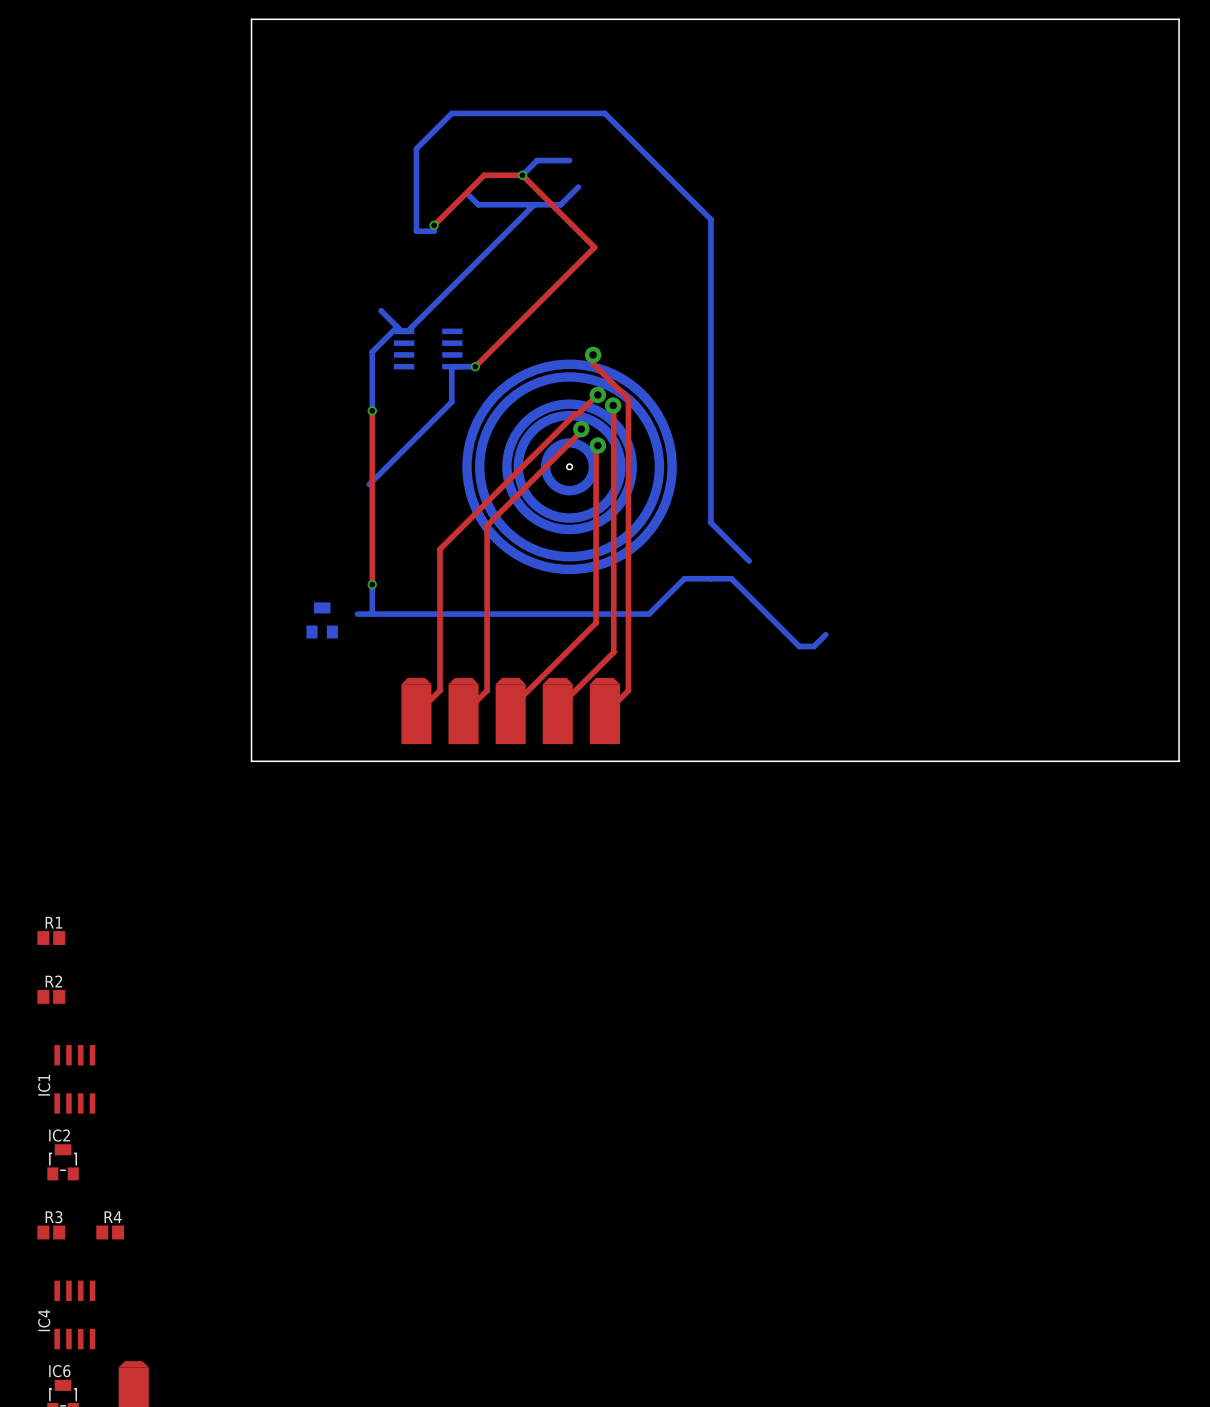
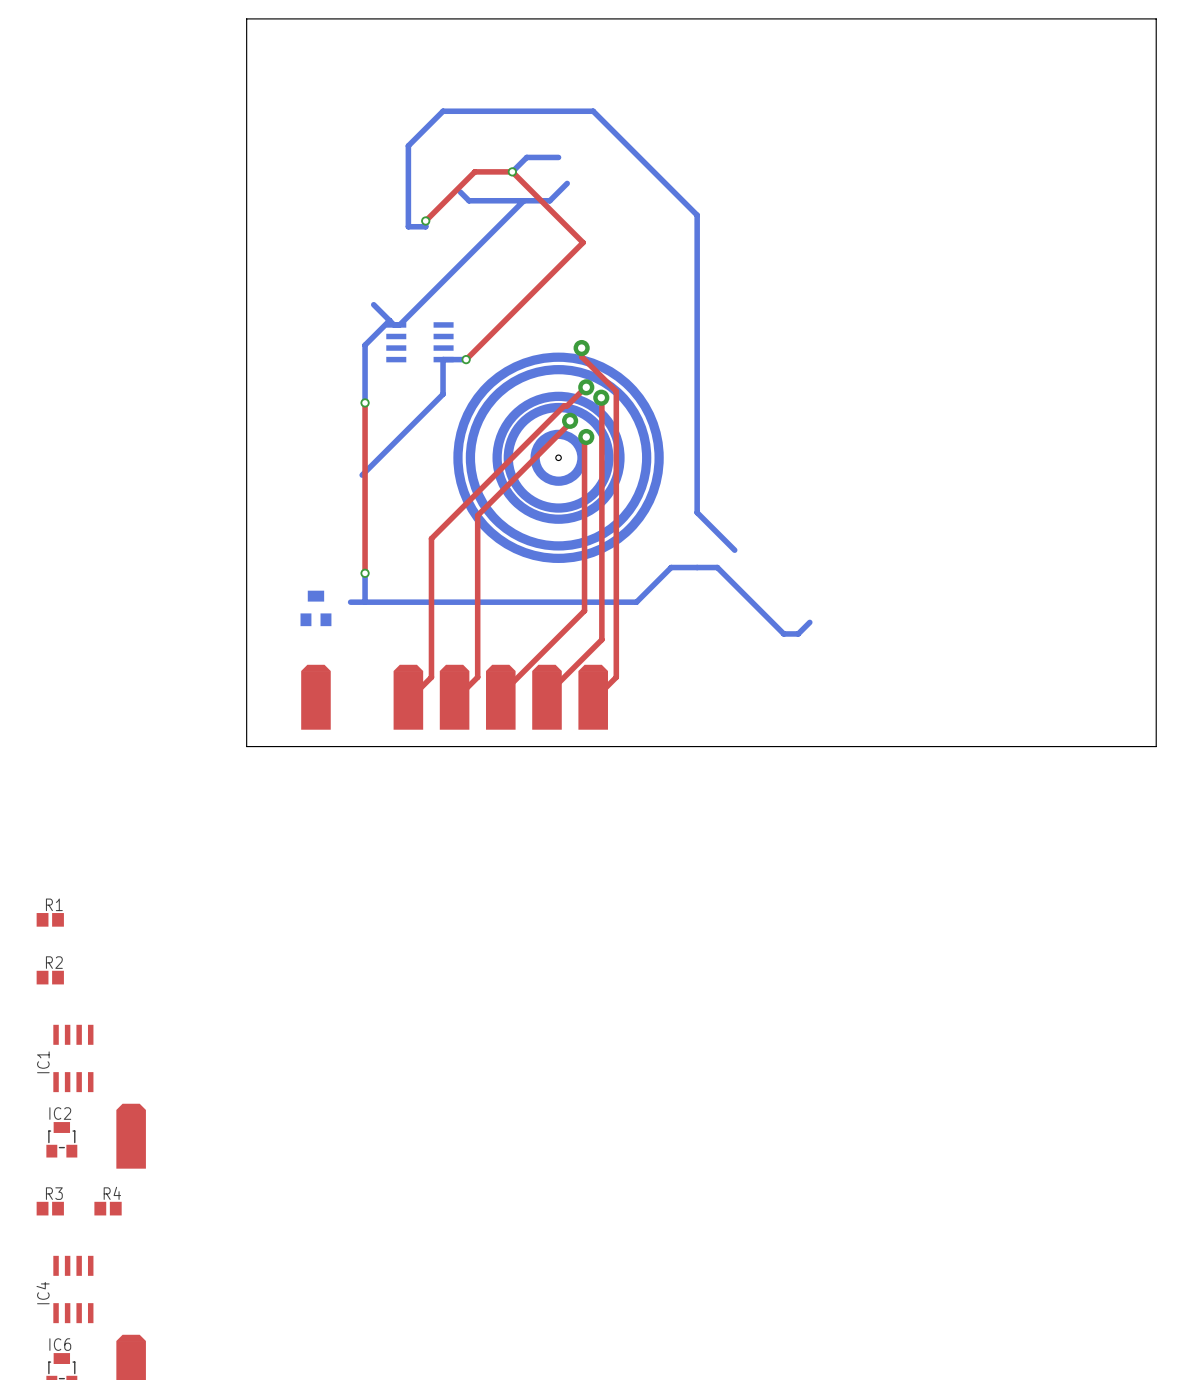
part: none -> (315, 697)
part: none -> (131, 1136)

